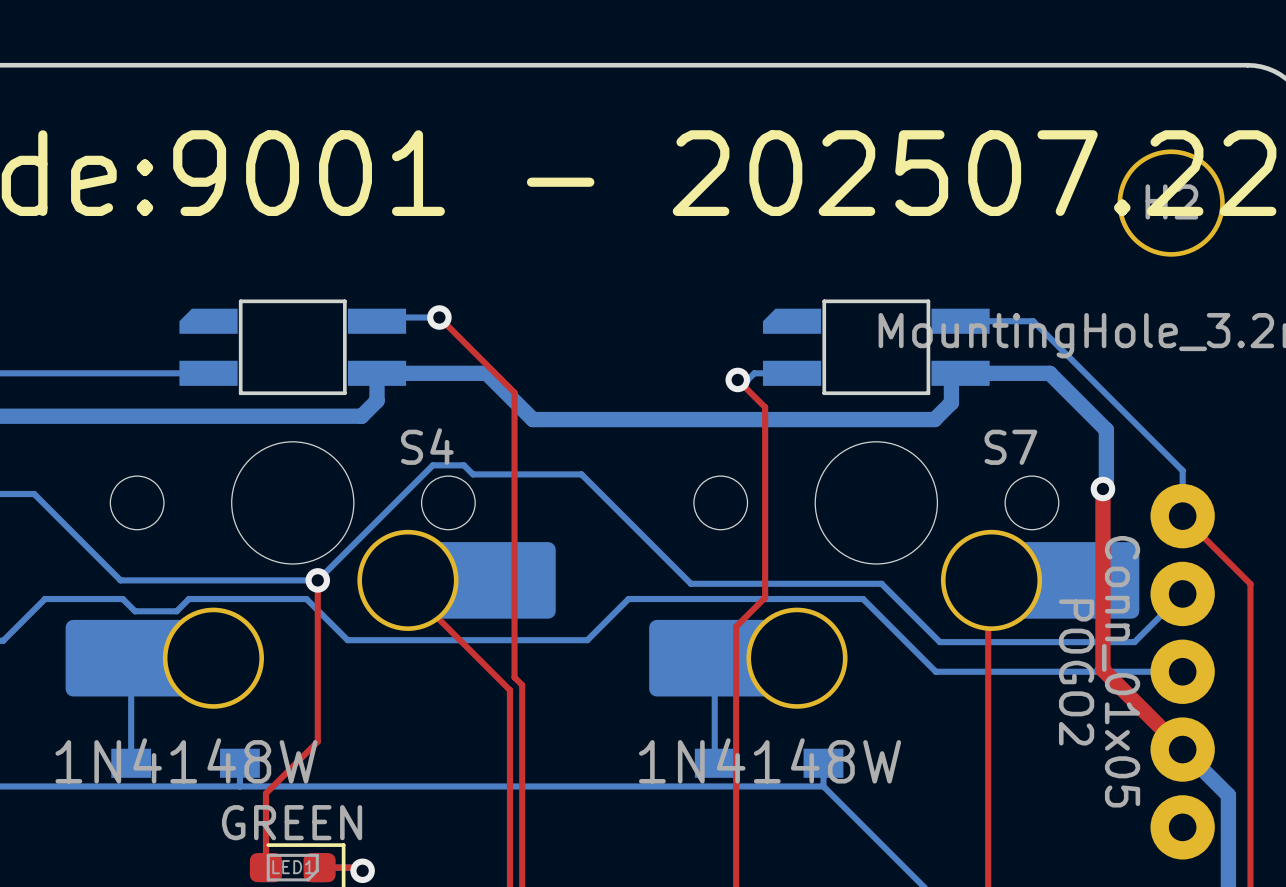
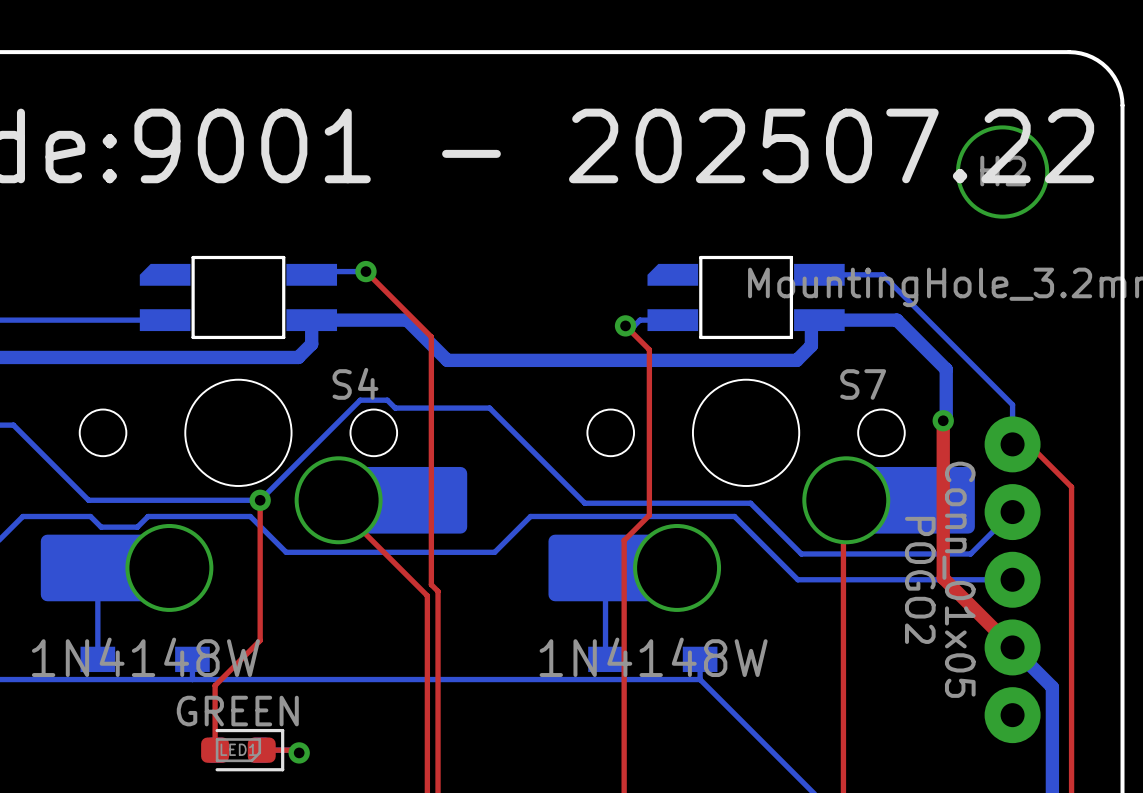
top track: (1182, 516) (1250, 583) -> (1028, 444) (1071, 487) (1071, 503)

